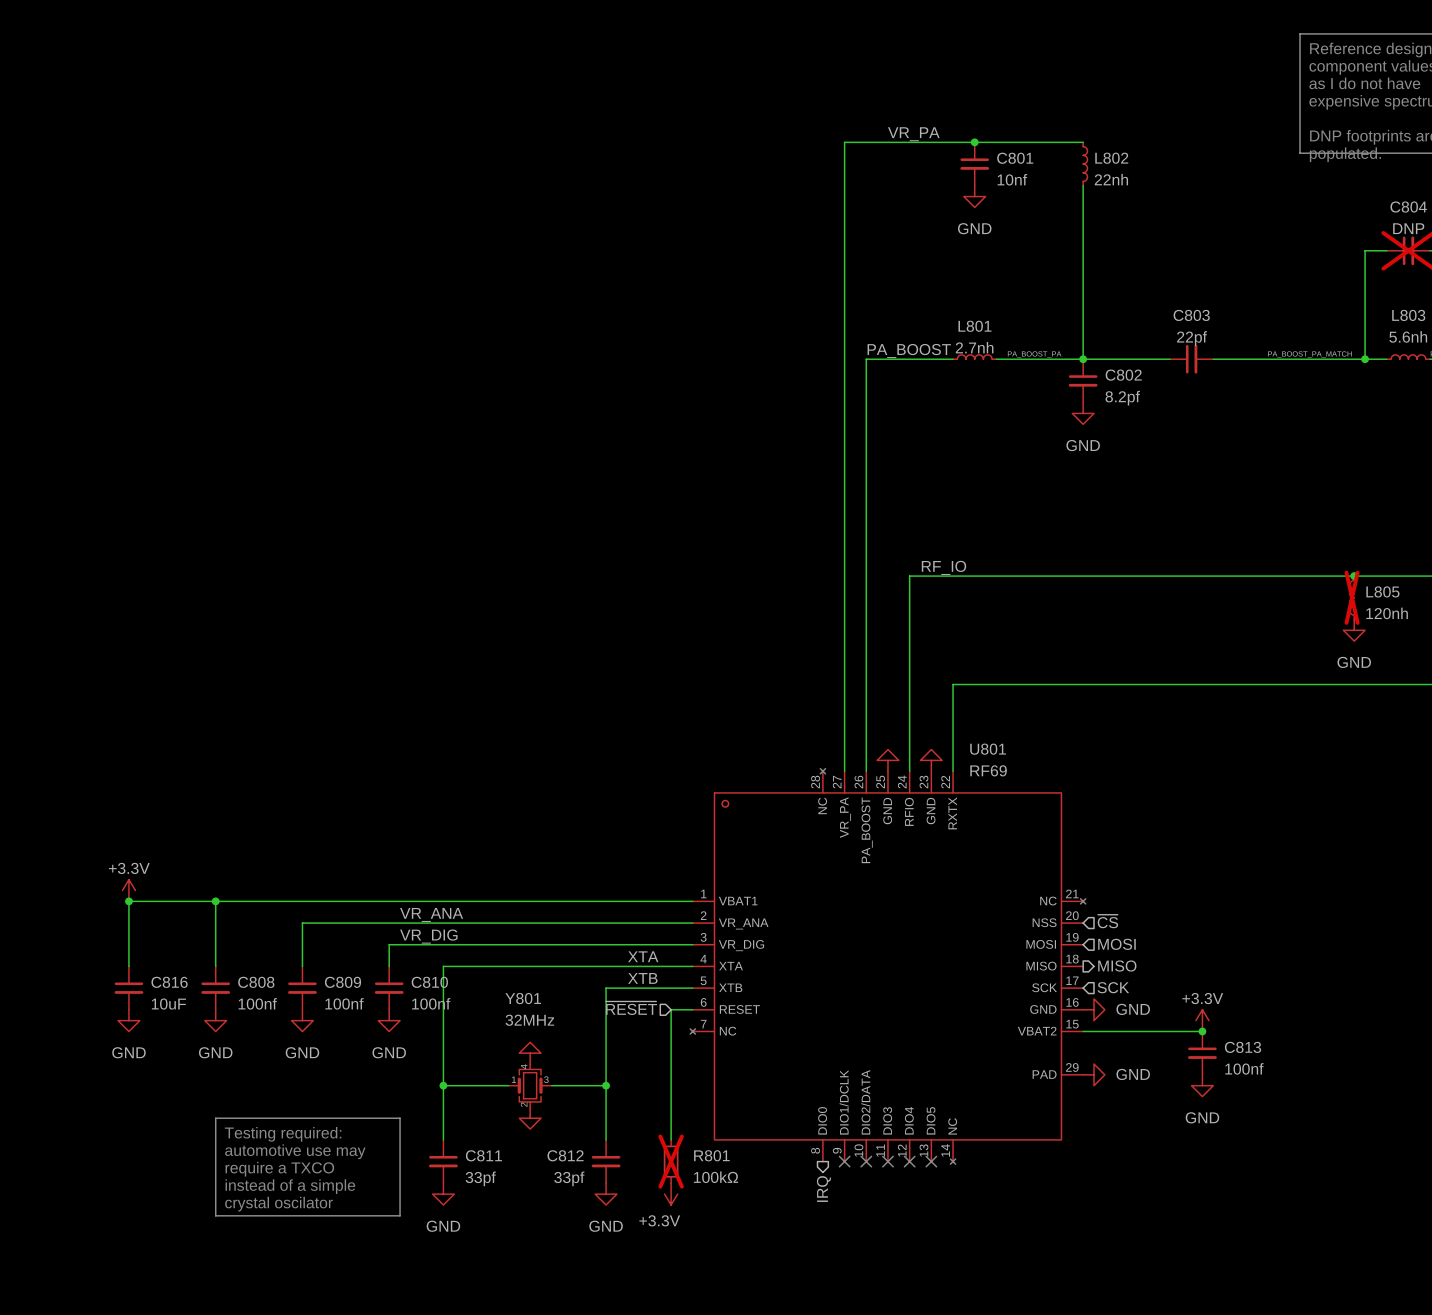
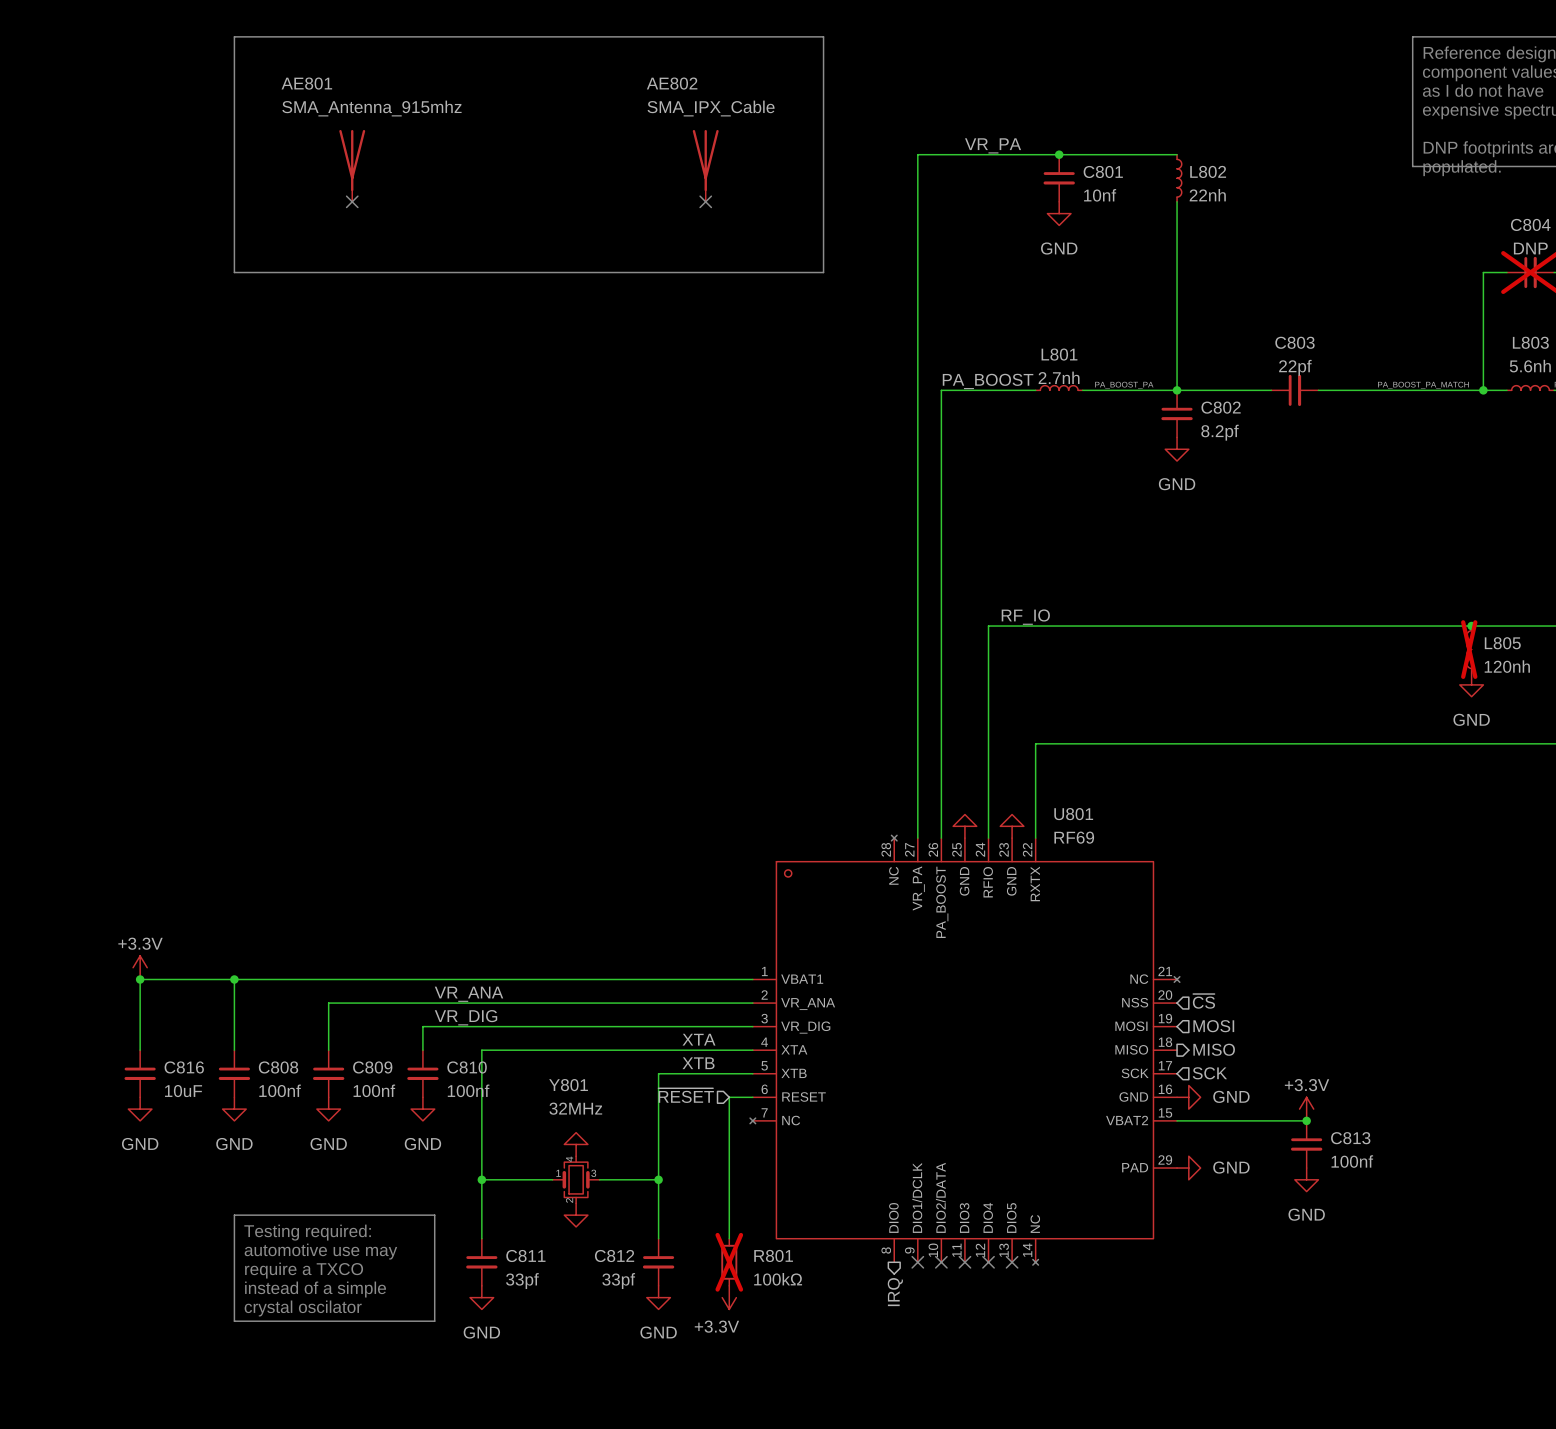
line: none -> (234, 36) (823, 36) (823, 272) (234, 272) (234, 36)
AE801: none -> SMA_Antenna_915mhz (352, 165)
AE802: none -> SMA_IPX_Cable (705, 165)
no-connect mark: none -> (352, 201)
no-connect mark: none -> (705, 201)

